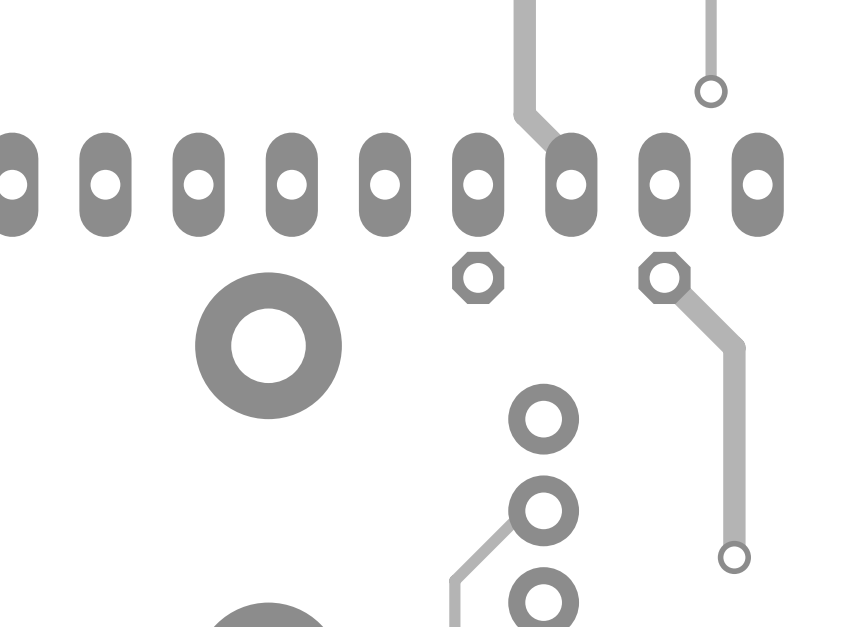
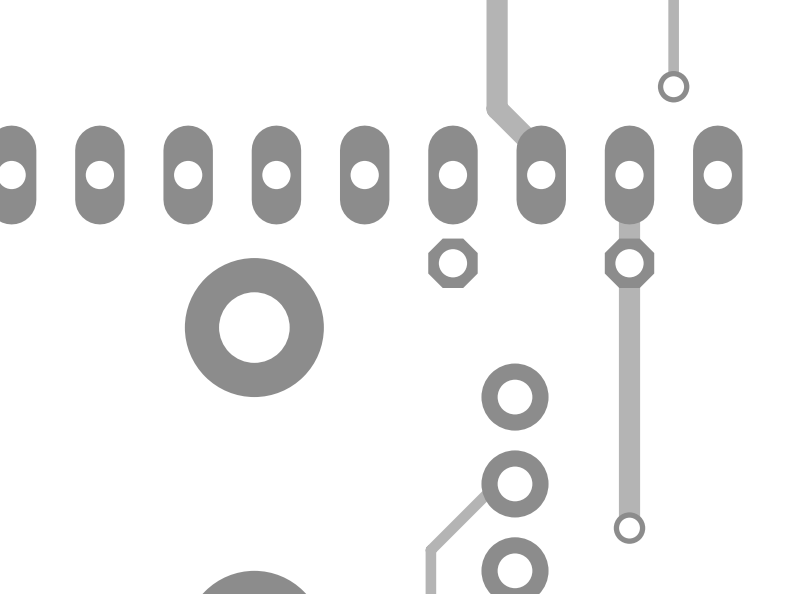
track: none -> (629, 175) (629, 528)
track: (664, 277) (734, 347) (734, 557) -> none
via position: (734, 557) -> (629, 528)

